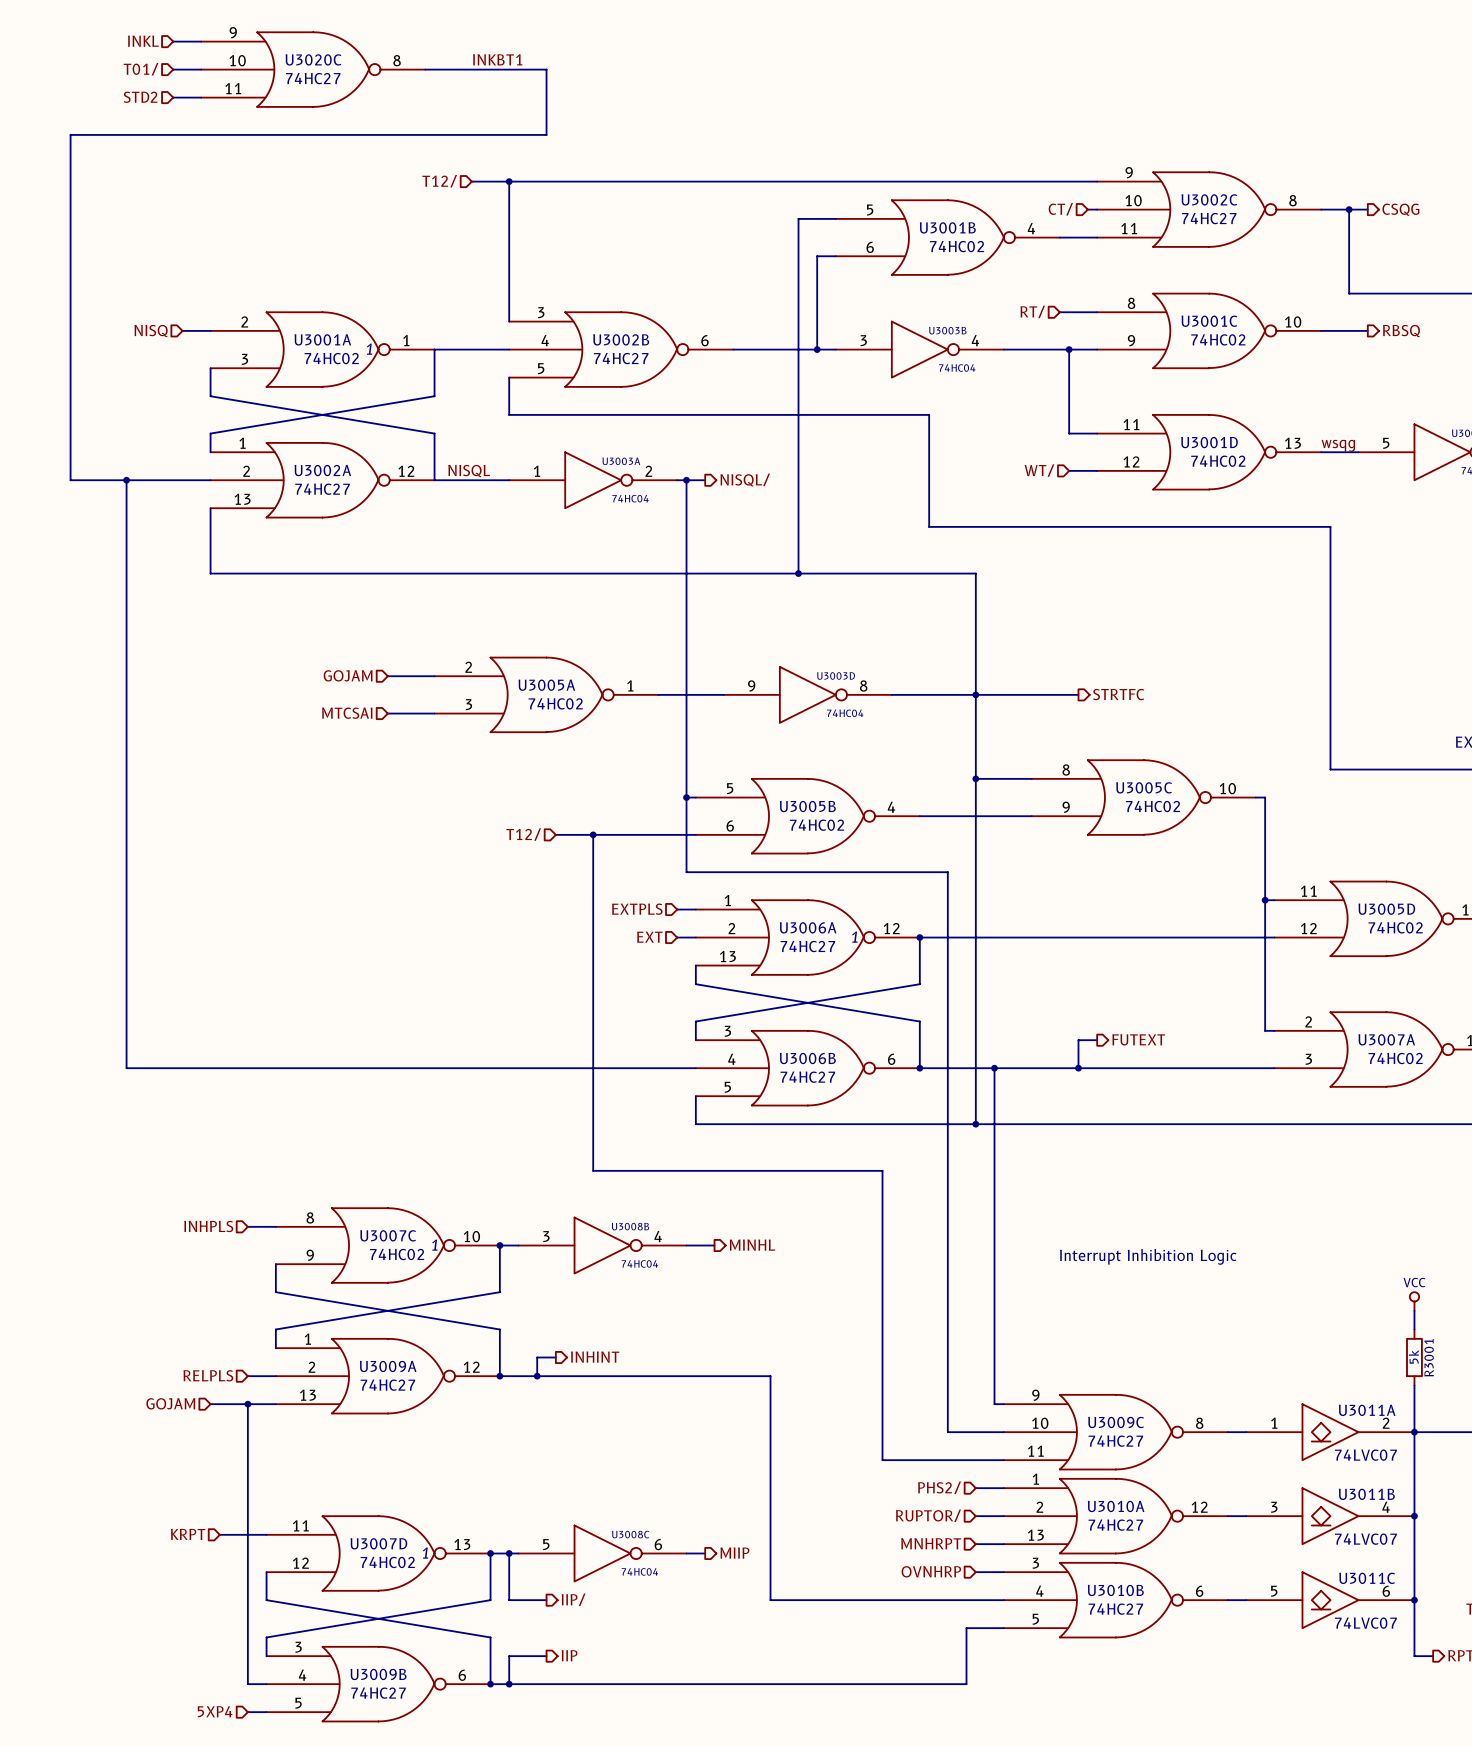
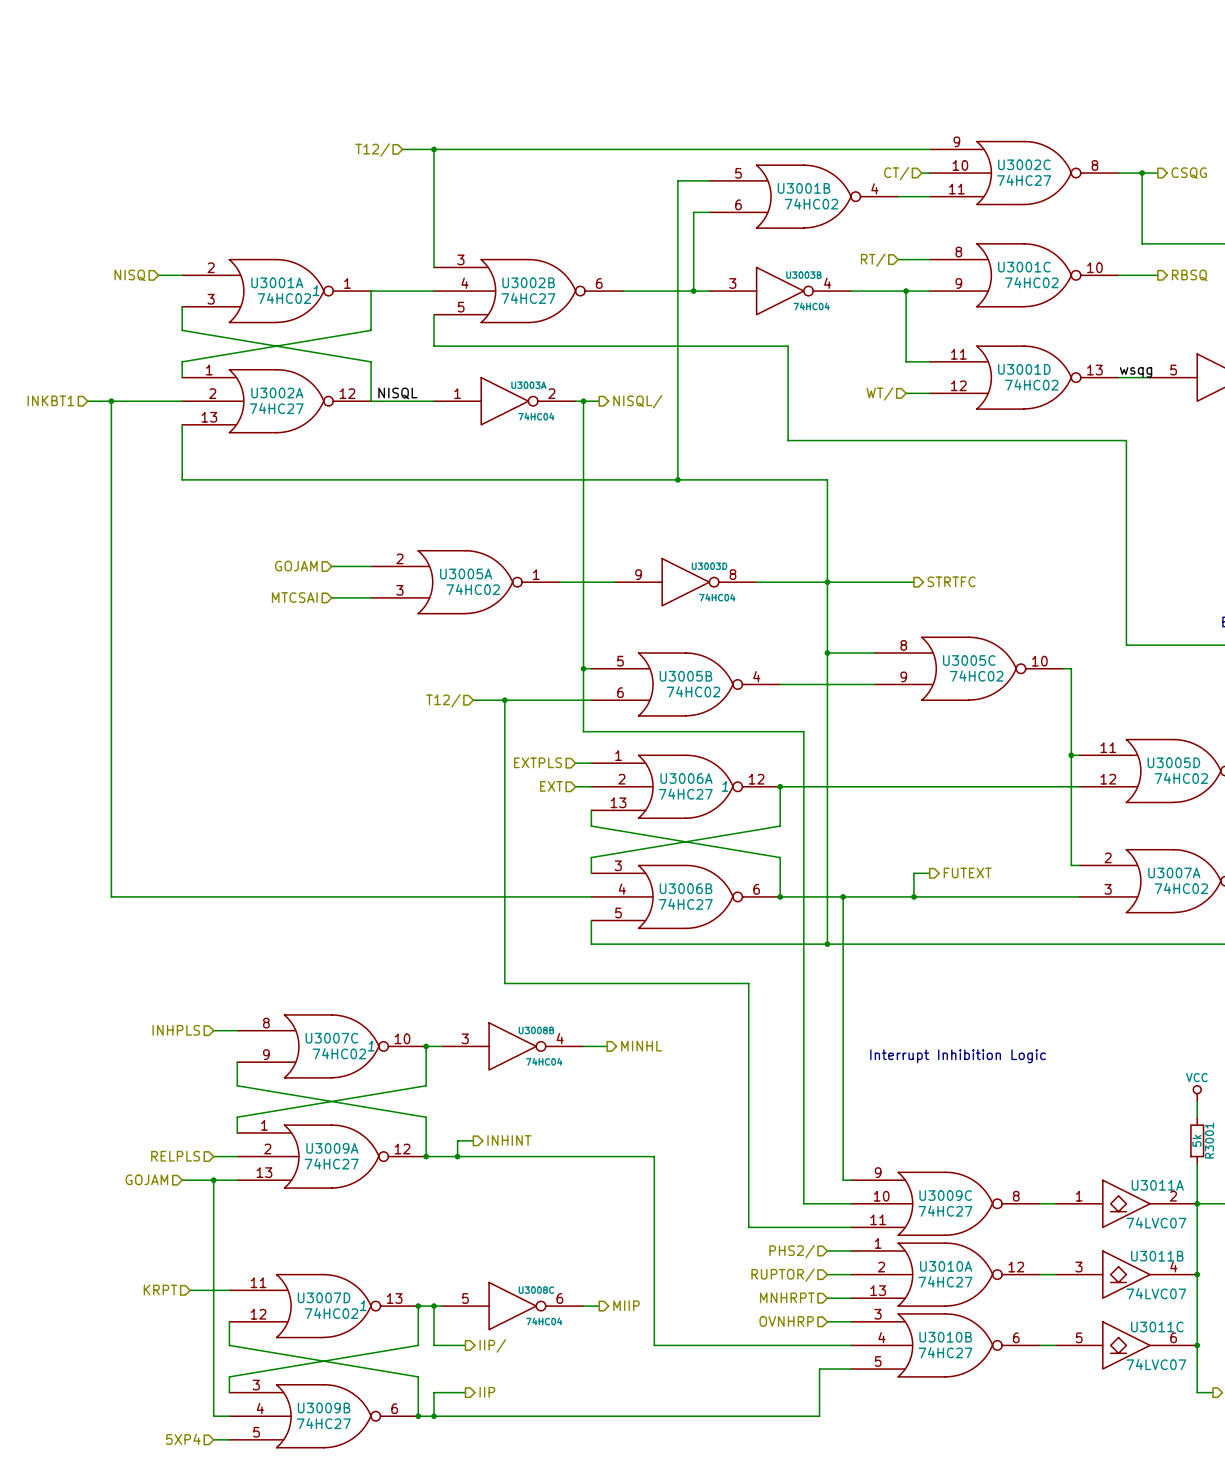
hierarchical label: INKL (143, 41) -> none
wire: (173, 41) (201, 41) -> none
label: INKBT1 (497, 59) -> none
hierarchical label: T01/ (141, 69) -> none
wire: (173, 69) (201, 69) -> none
U3020C: 74HC27 (313, 69) -> none
wire: (425, 69) (546, 69) (546, 134) (70, 134) (70, 480) (98, 480) -> none
hierarchical label: STD2 (140, 97) -> none
wire: (173, 97) (201, 97) -> none
hierarchical label: none -> INKBT1 (50, 400)

